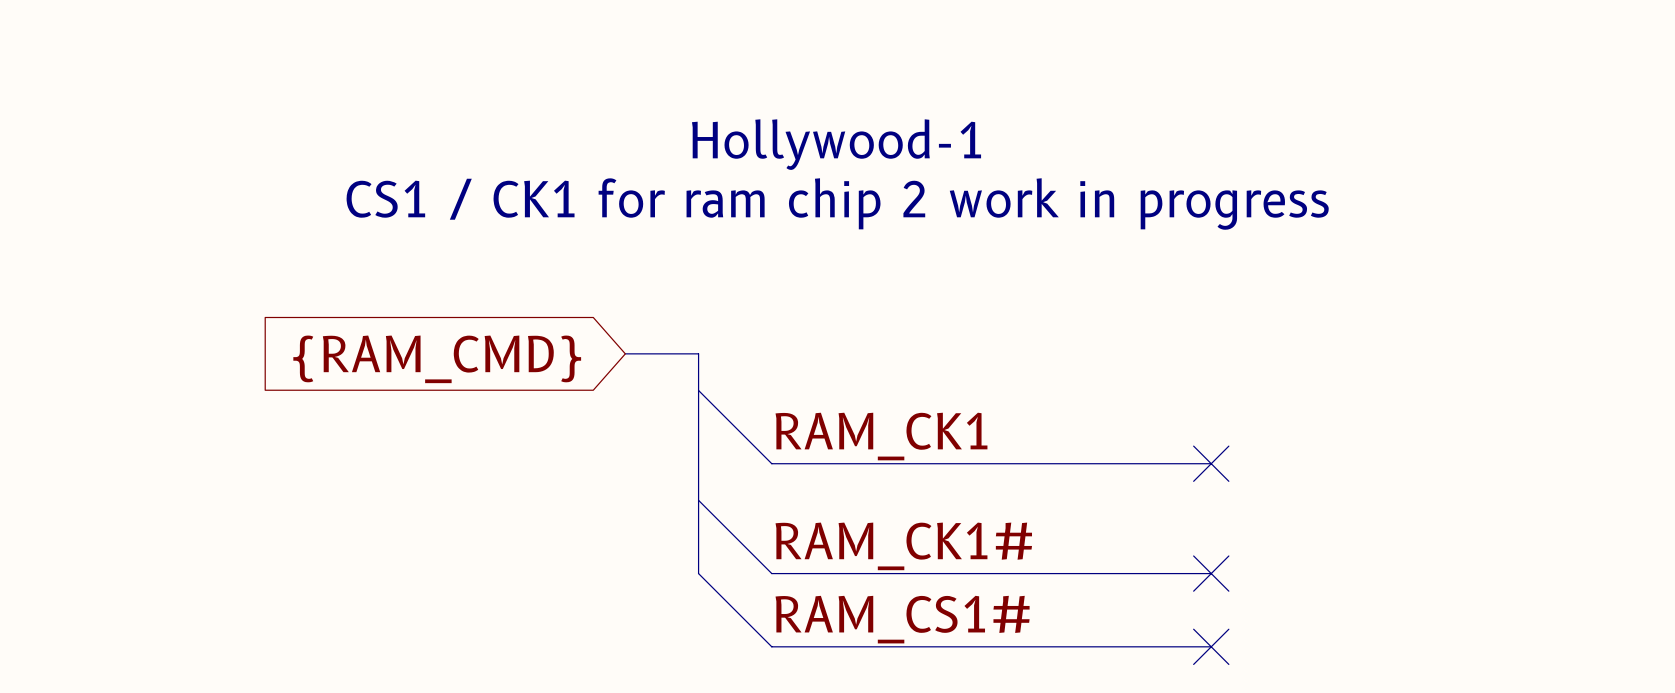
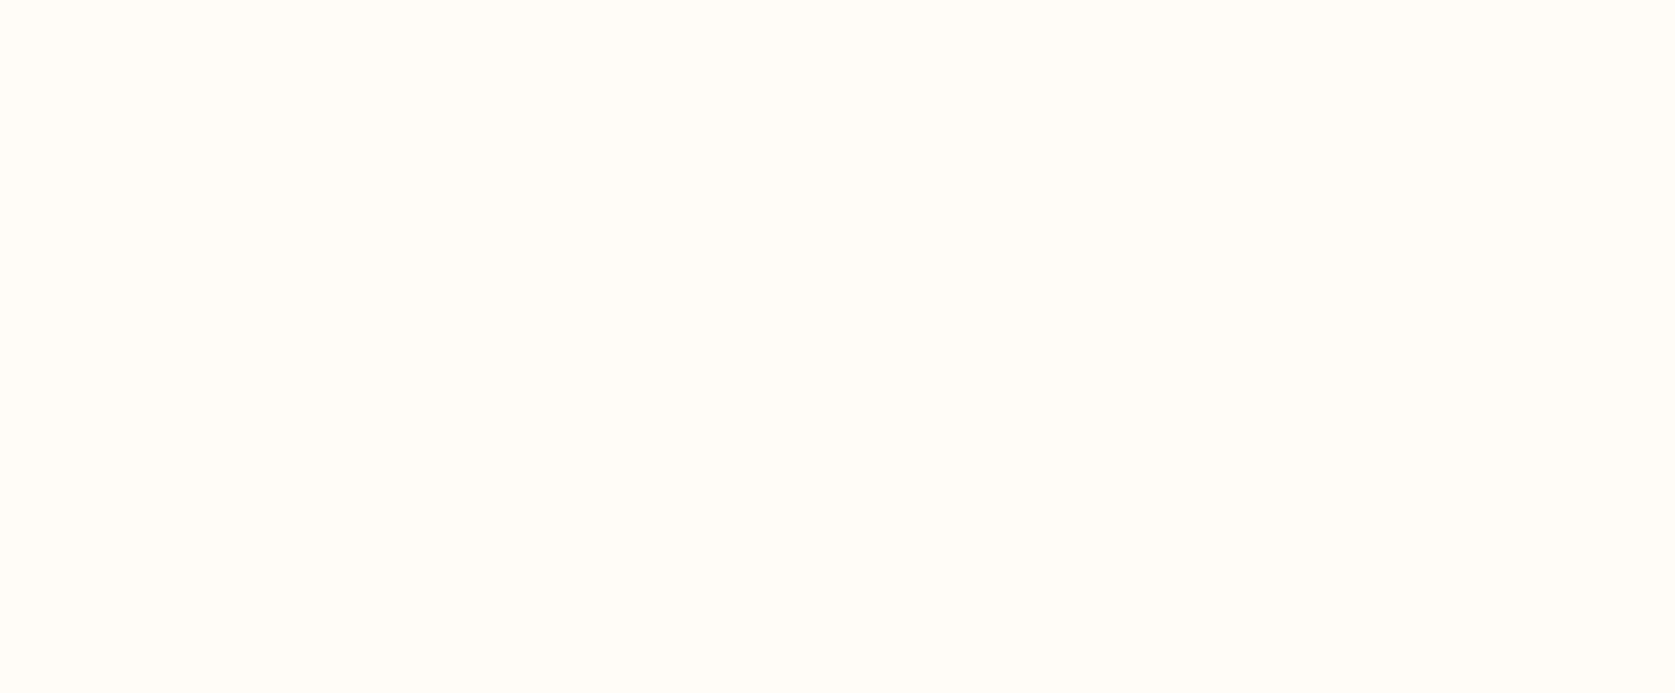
text: Hollywood-1 (836, 144) -> none
text: CS1 / CK1 for ram chip 2 work in progress (837, 204) -> none
bus: (625, 353) (698, 353) (698, 573) -> none
global label: {RAM_CMD} (437, 359) -> none
wire: (698, 390) (771, 463) (1211, 463) -> none
label: RAM_CK1 (881, 436) -> none
no-connect mark: (1211, 463) -> none
wire: (698, 500) (771, 573) (1211, 573) -> none
label: RAM_CK1# (903, 546) -> none
wire: (698, 573) (771, 646) (1211, 646) -> none
no-connect mark: (1211, 573) -> none
label: RAM_CS1# (902, 619) -> none
no-connect mark: (1211, 646) -> none

